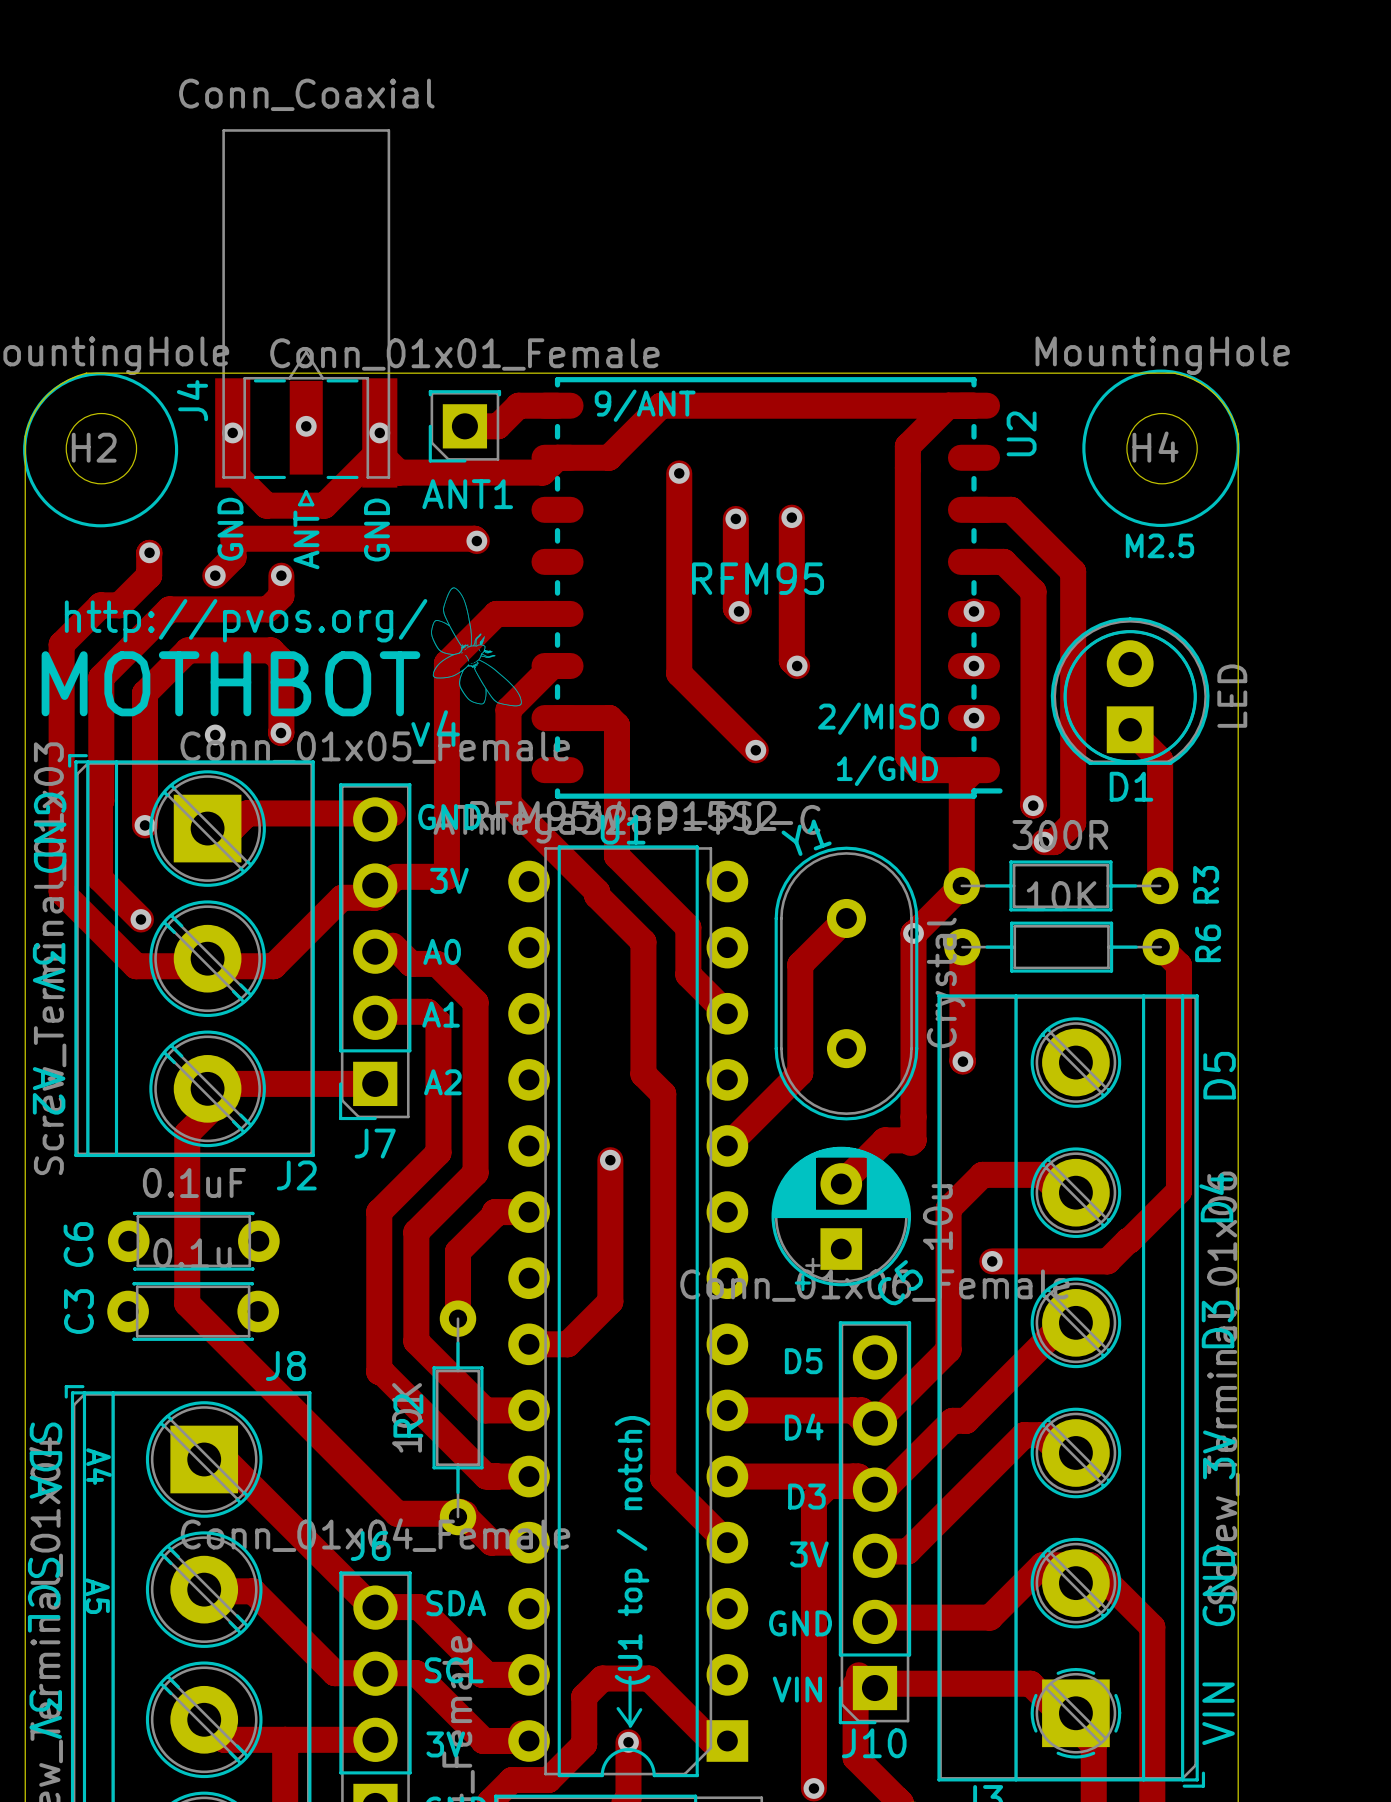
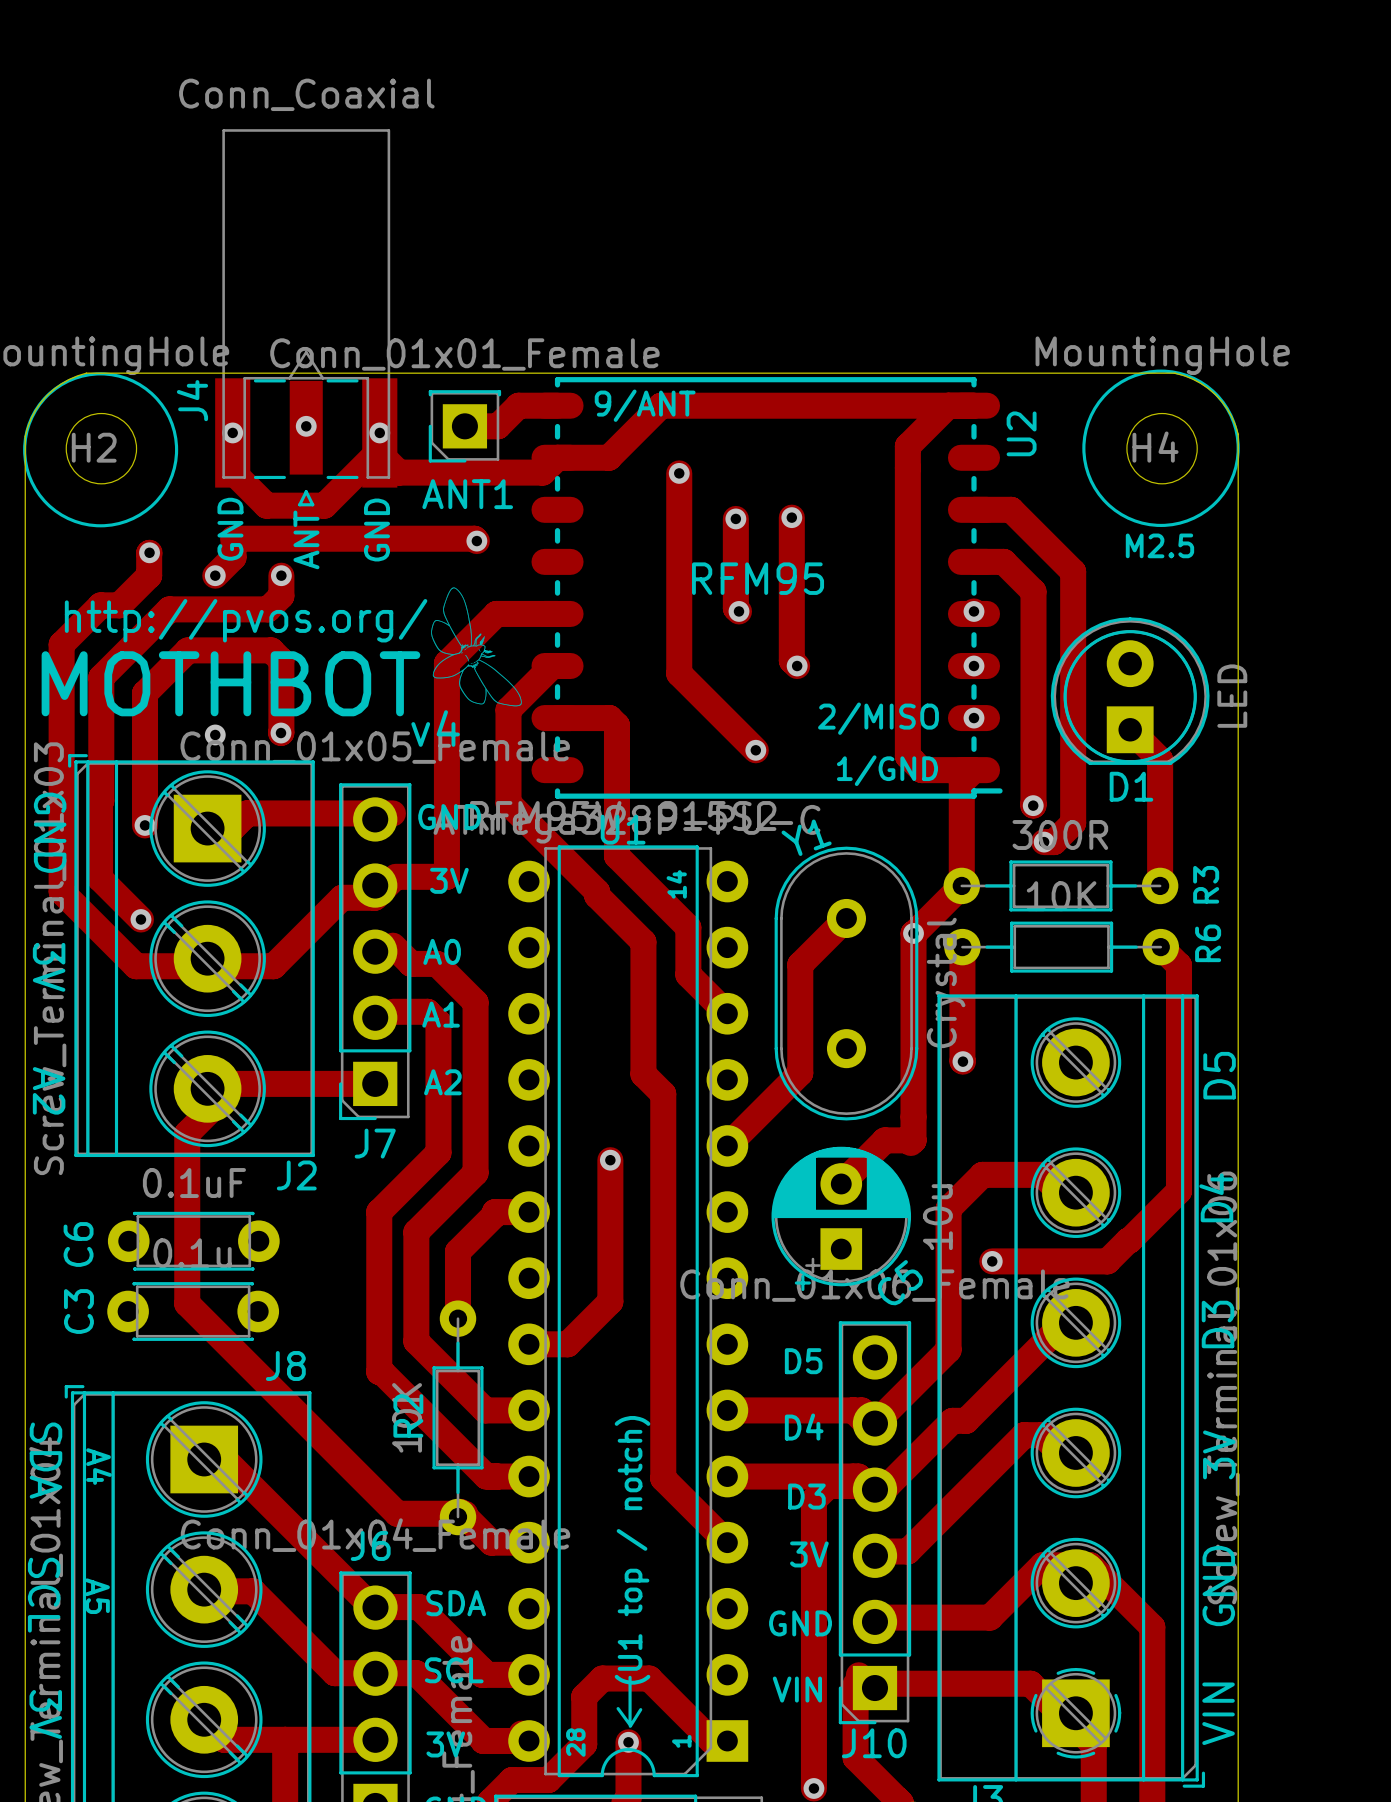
text: none -> 14 (676, 884)
text: none -> 1 (681, 1741)
text: none -> 28 (575, 1742)

